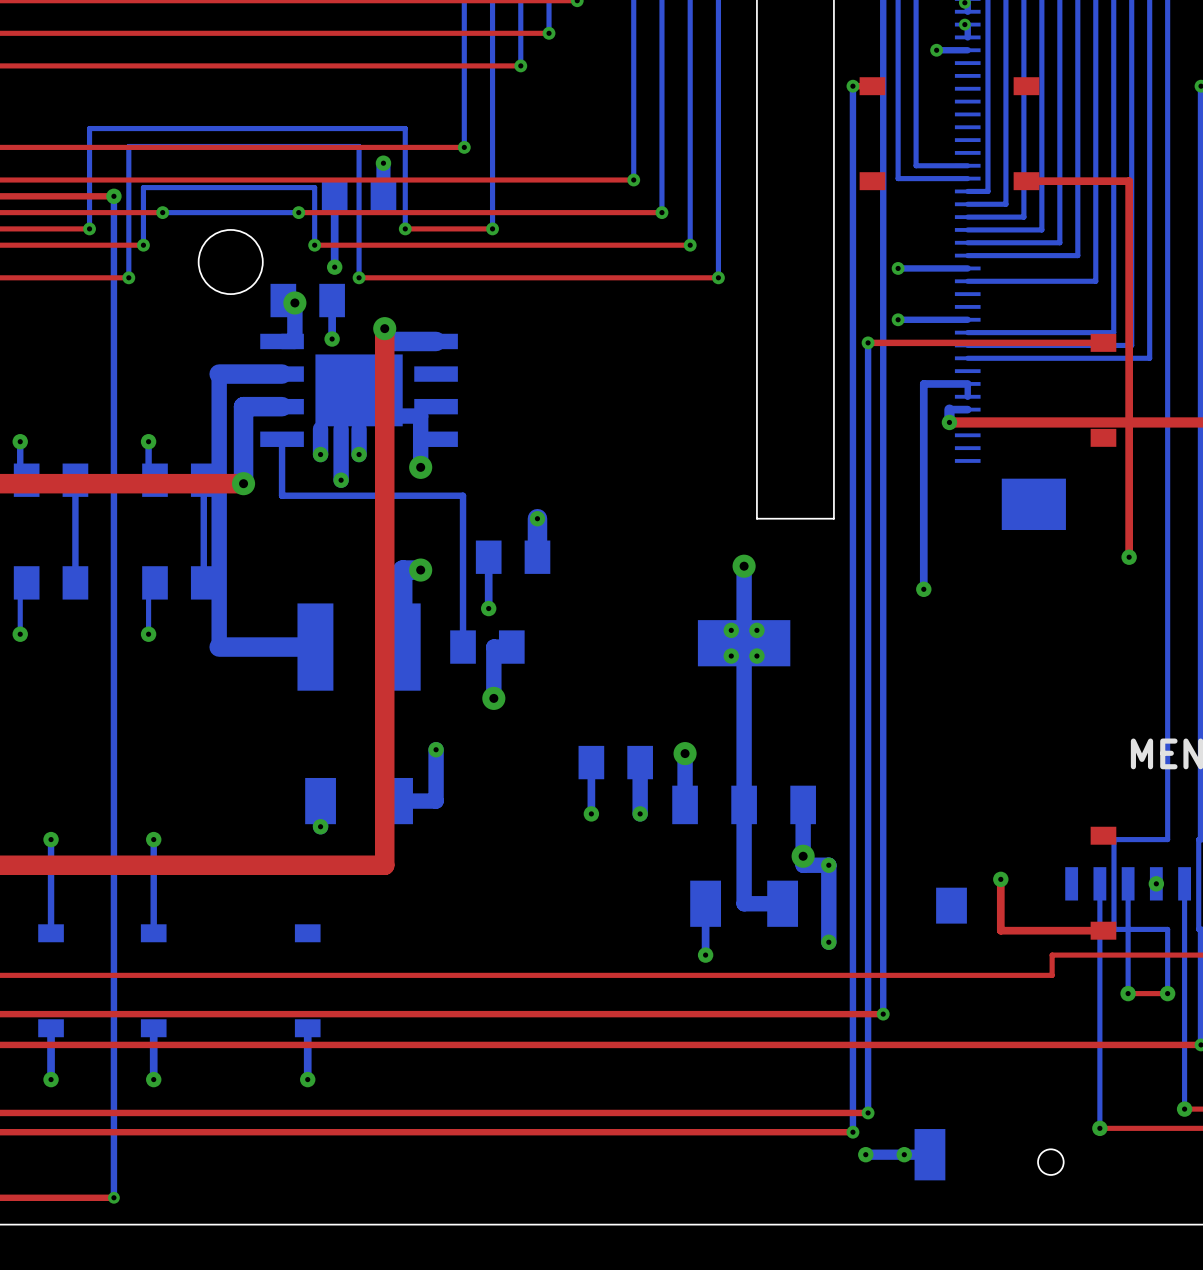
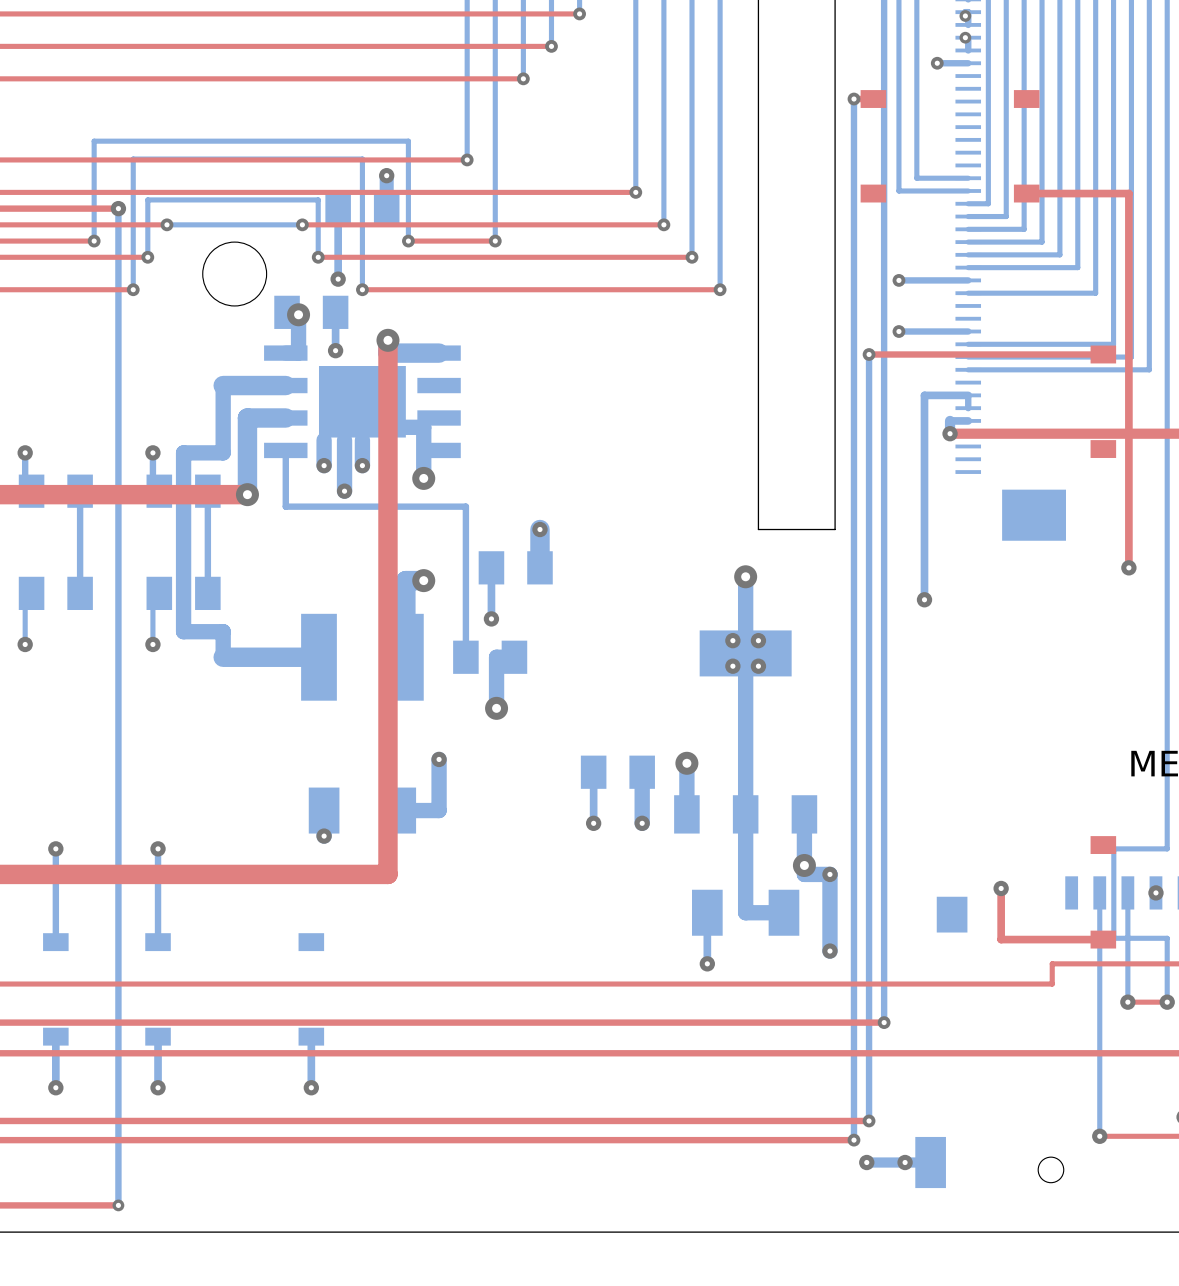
bottom track: (219, 441) (219, 621) -> (223, 452) (183, 452) (183, 631) (223, 631)

